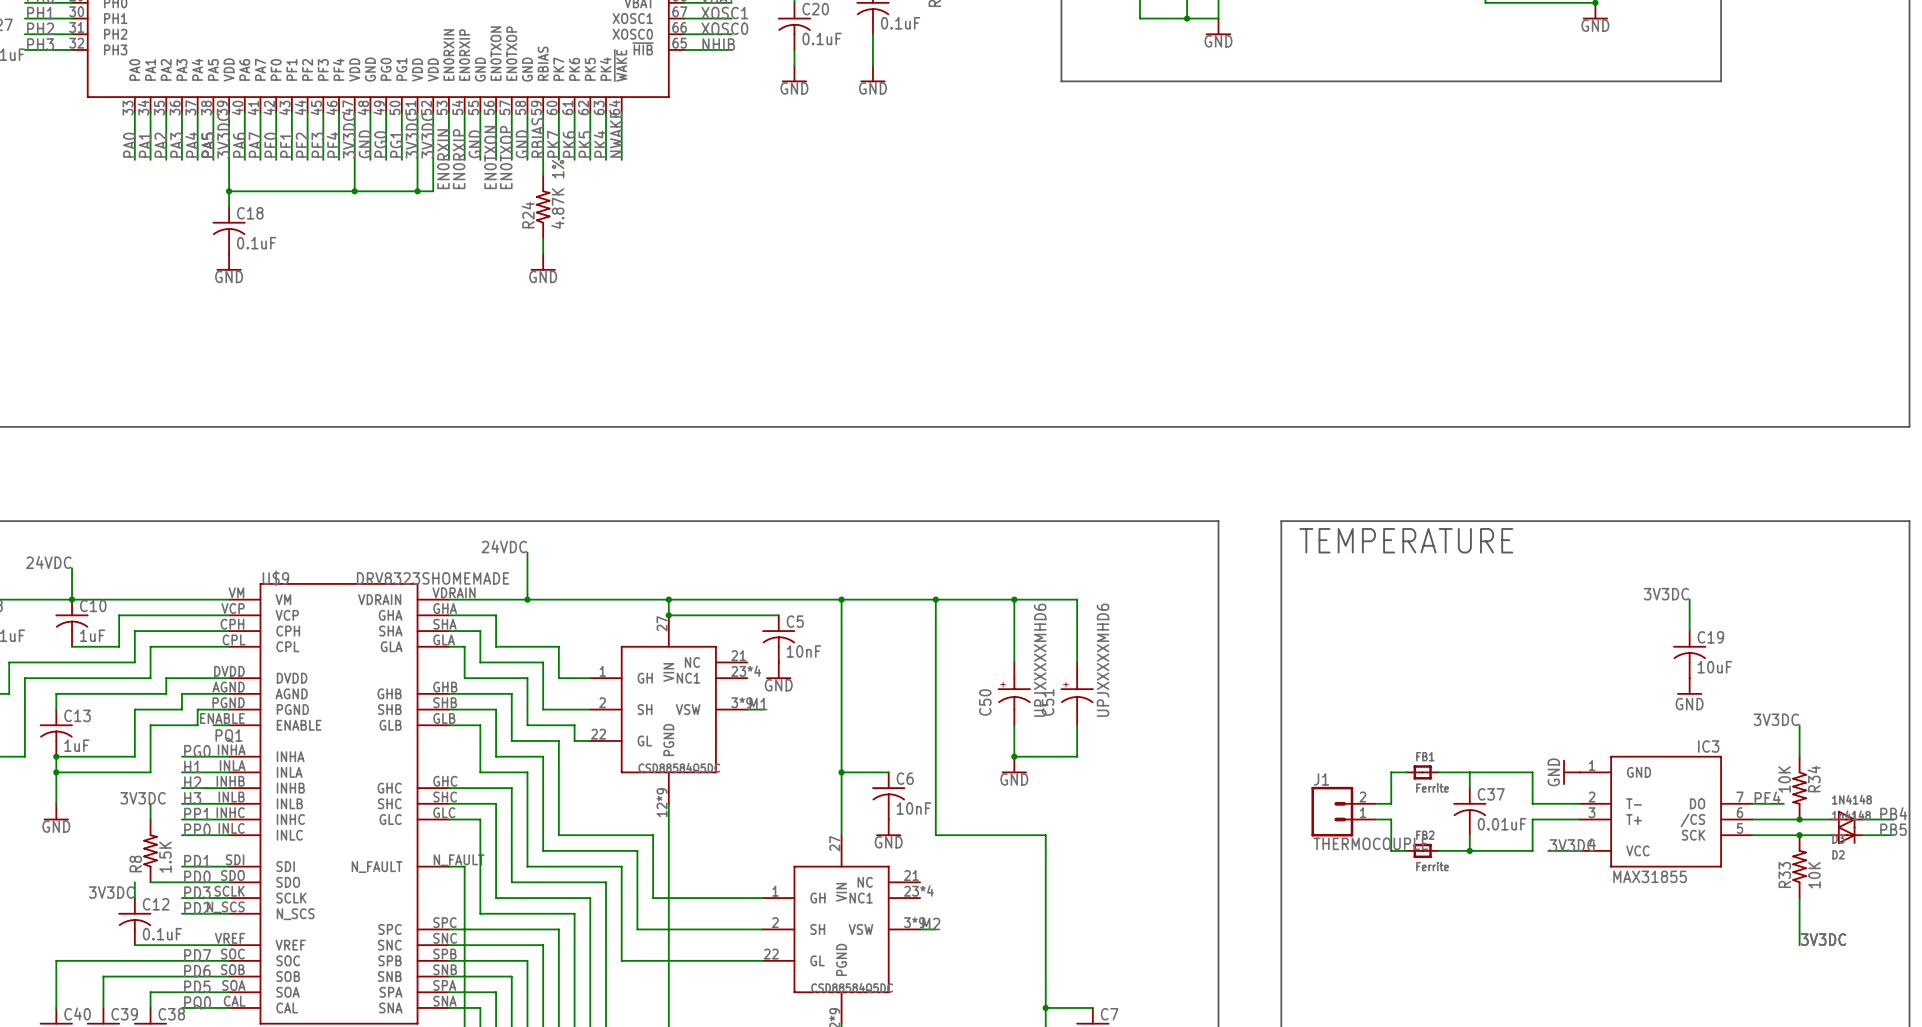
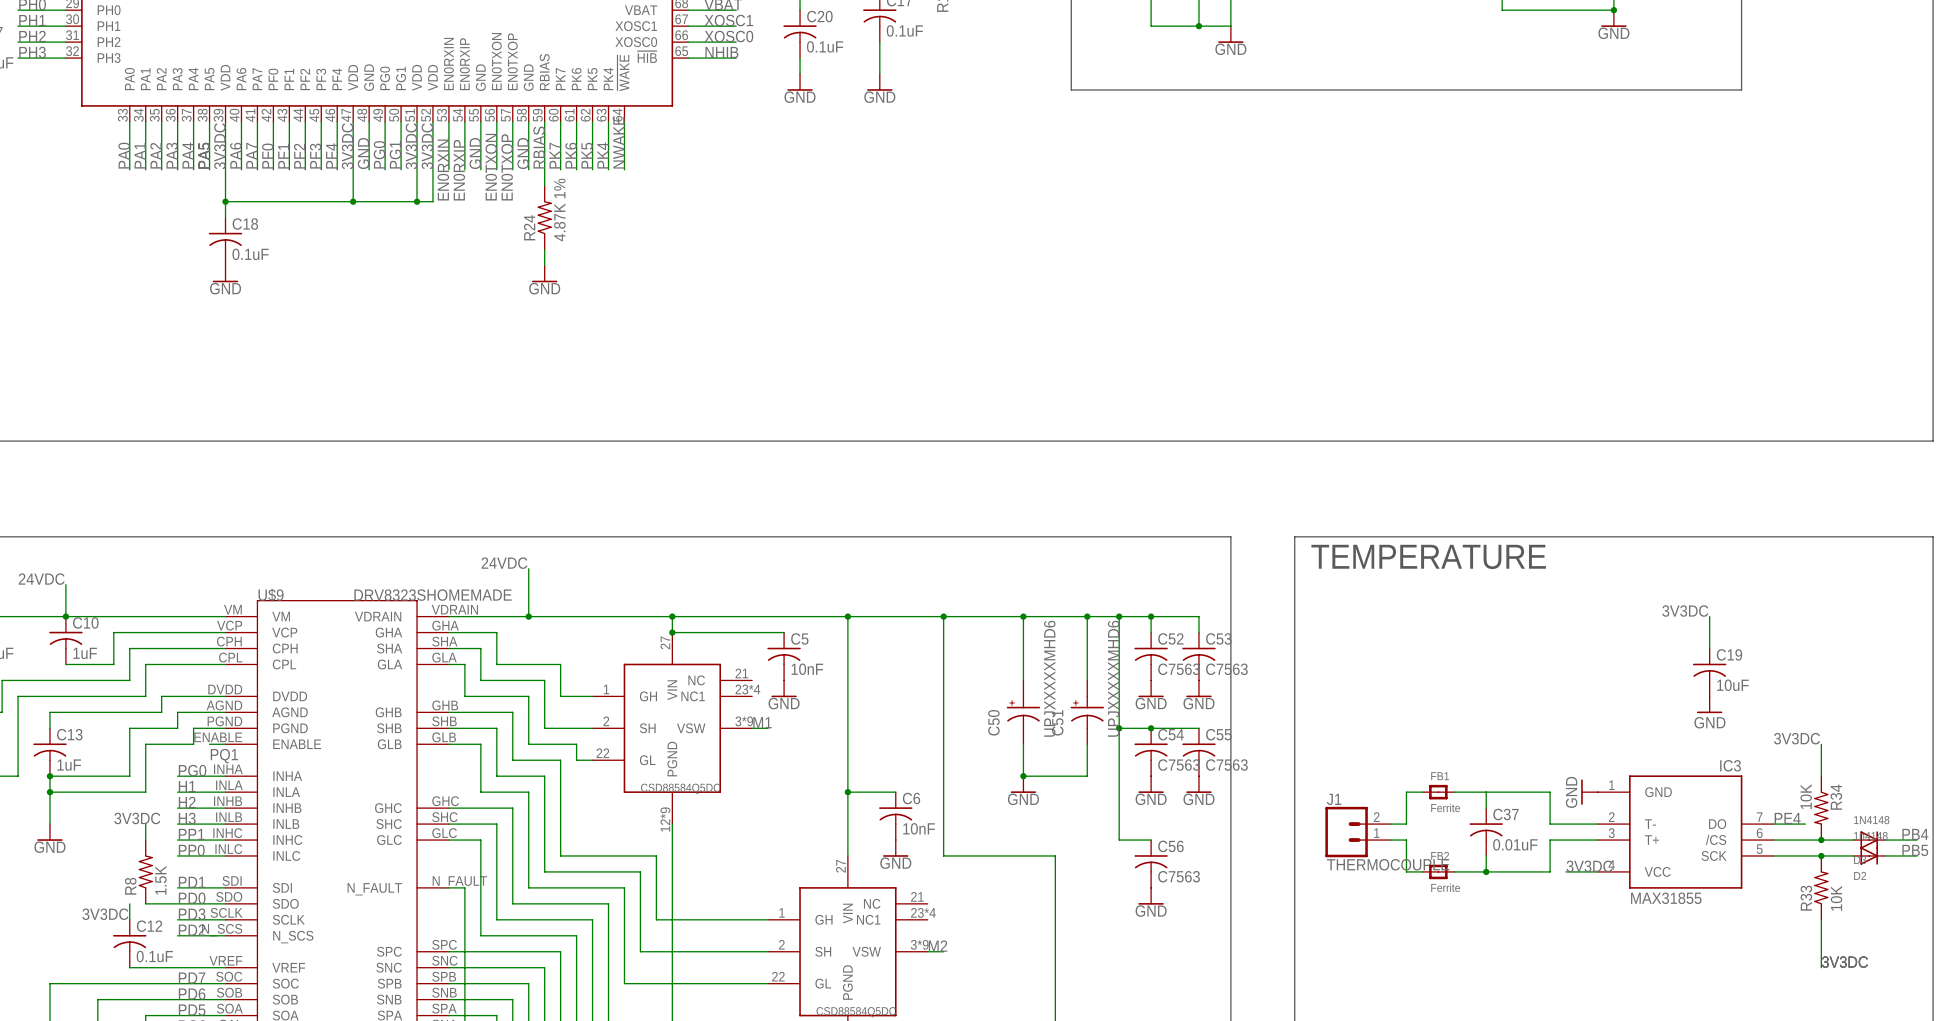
wire: none -> (1087, 616) (1198, 616) (1198, 632)
junction: none -> (1087, 616)
wire: none -> (1119, 616) (1119, 840) (1151, 840)
junction: none -> (1119, 616)
wire: none -> (1151, 616) (1151, 632)
junction: none -> (1151, 616)
C52: none -> C7563 (1151, 656)
C53: none -> C7563 (1198, 656)
power symbol: none -> GND (1151, 688)
power symbol: none -> GND (1198, 688)
wire: none -> (1119, 728) (1198, 728)
junction: none -> (1119, 728)
junction: none -> (1151, 728)
C54: none -> C7563 (1151, 752)
C55: none -> C7563 (1198, 752)
power symbol: none -> GND (1151, 784)
power symbol: none -> GND (1198, 784)
C56: none -> C7563 (1151, 863)
power symbol: none -> GND (1151, 896)

